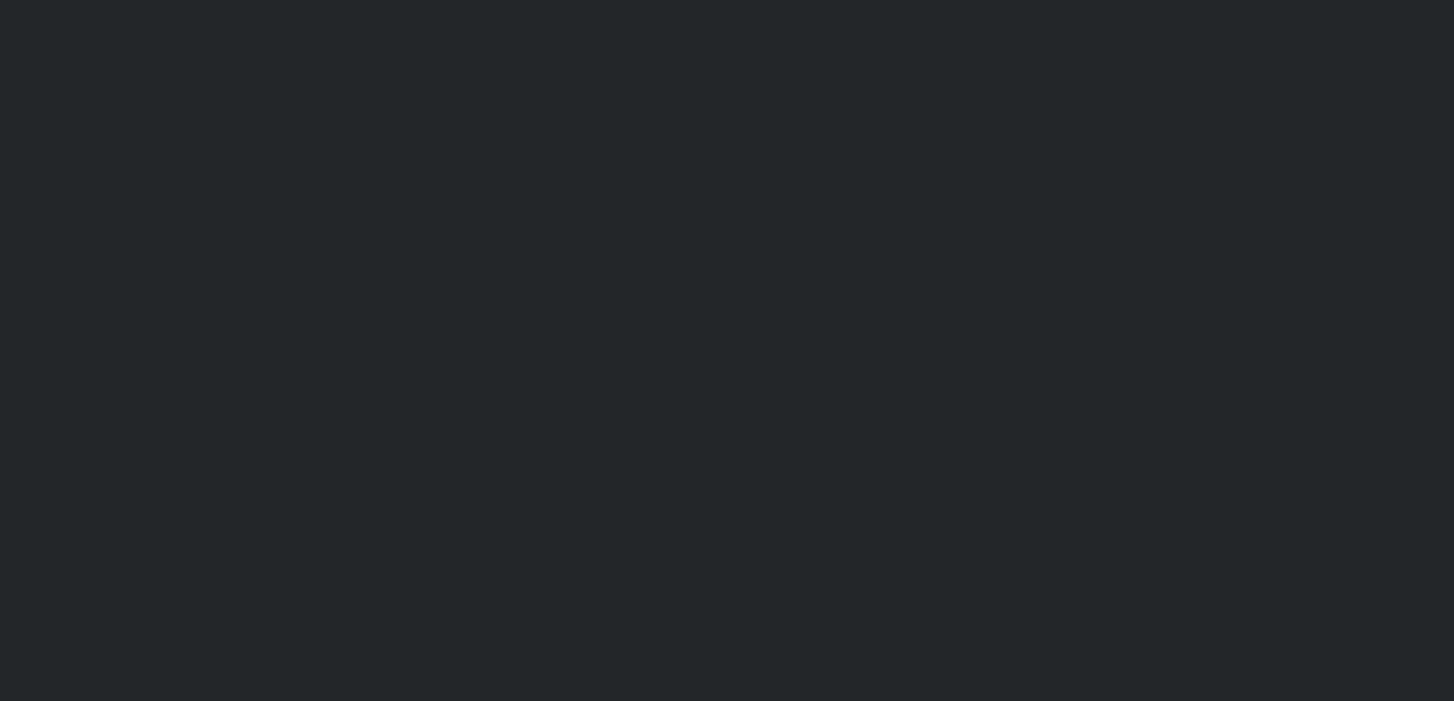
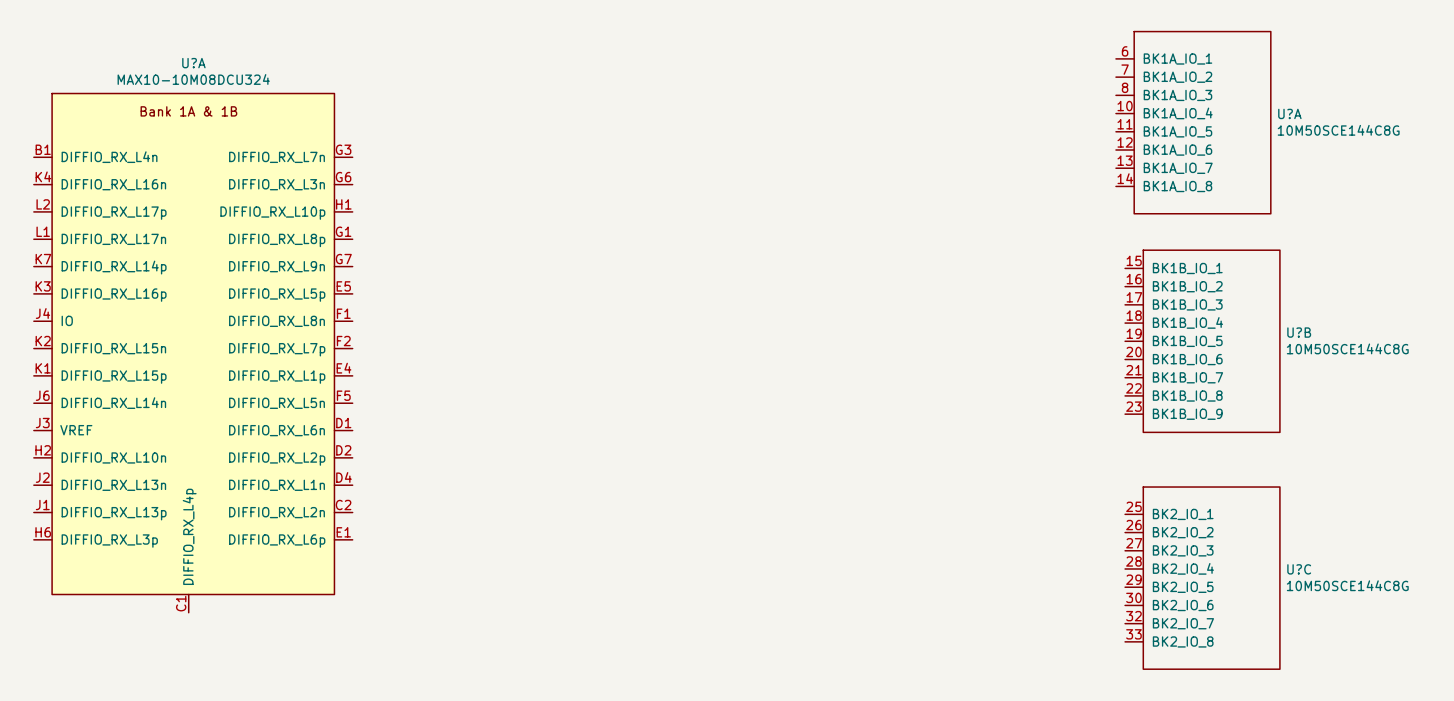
U?A: none -> 10M50SCE144C8G (1193, 122)
U?B: none -> 10M50SCE144C8G (1202, 341)
U?A: none -> MAX10-10M08DCU324 (193, 353)
U?C: none -> 10M50SCE144C8G (1202, 578)

